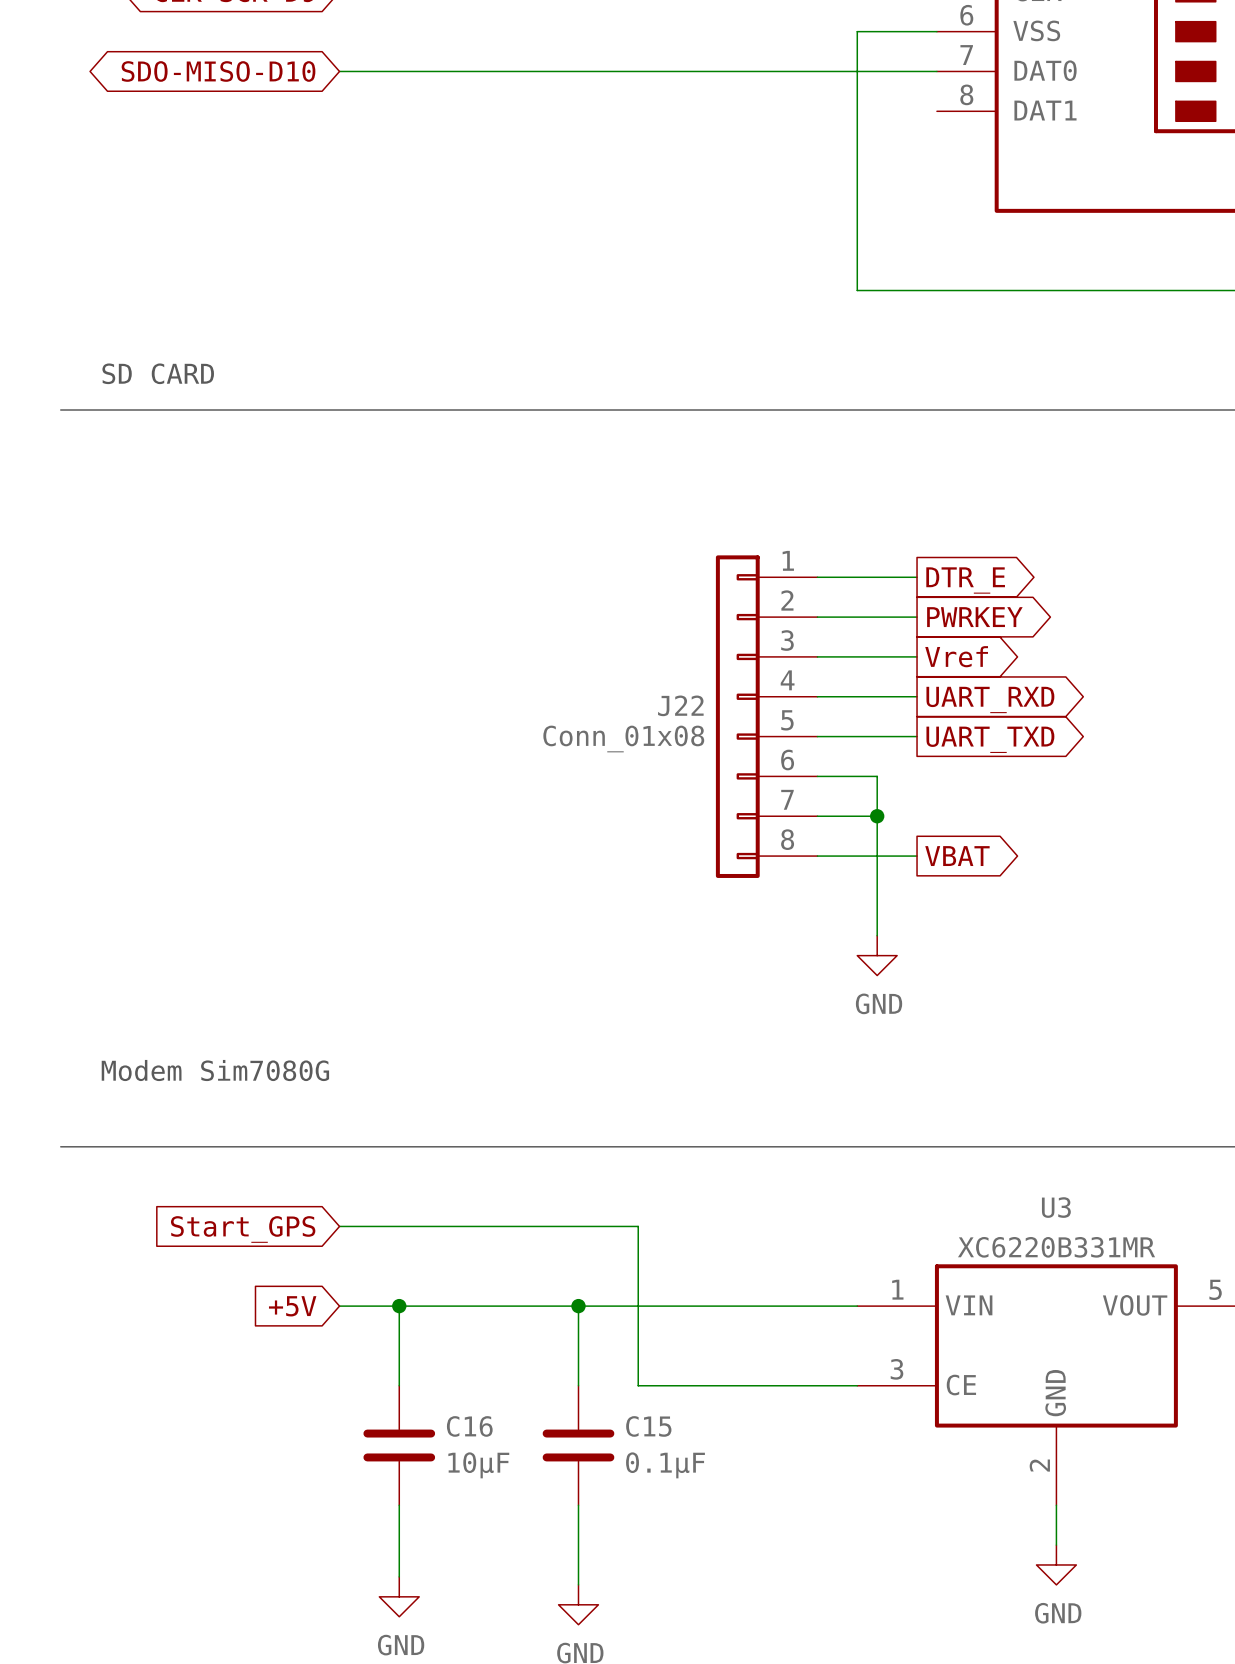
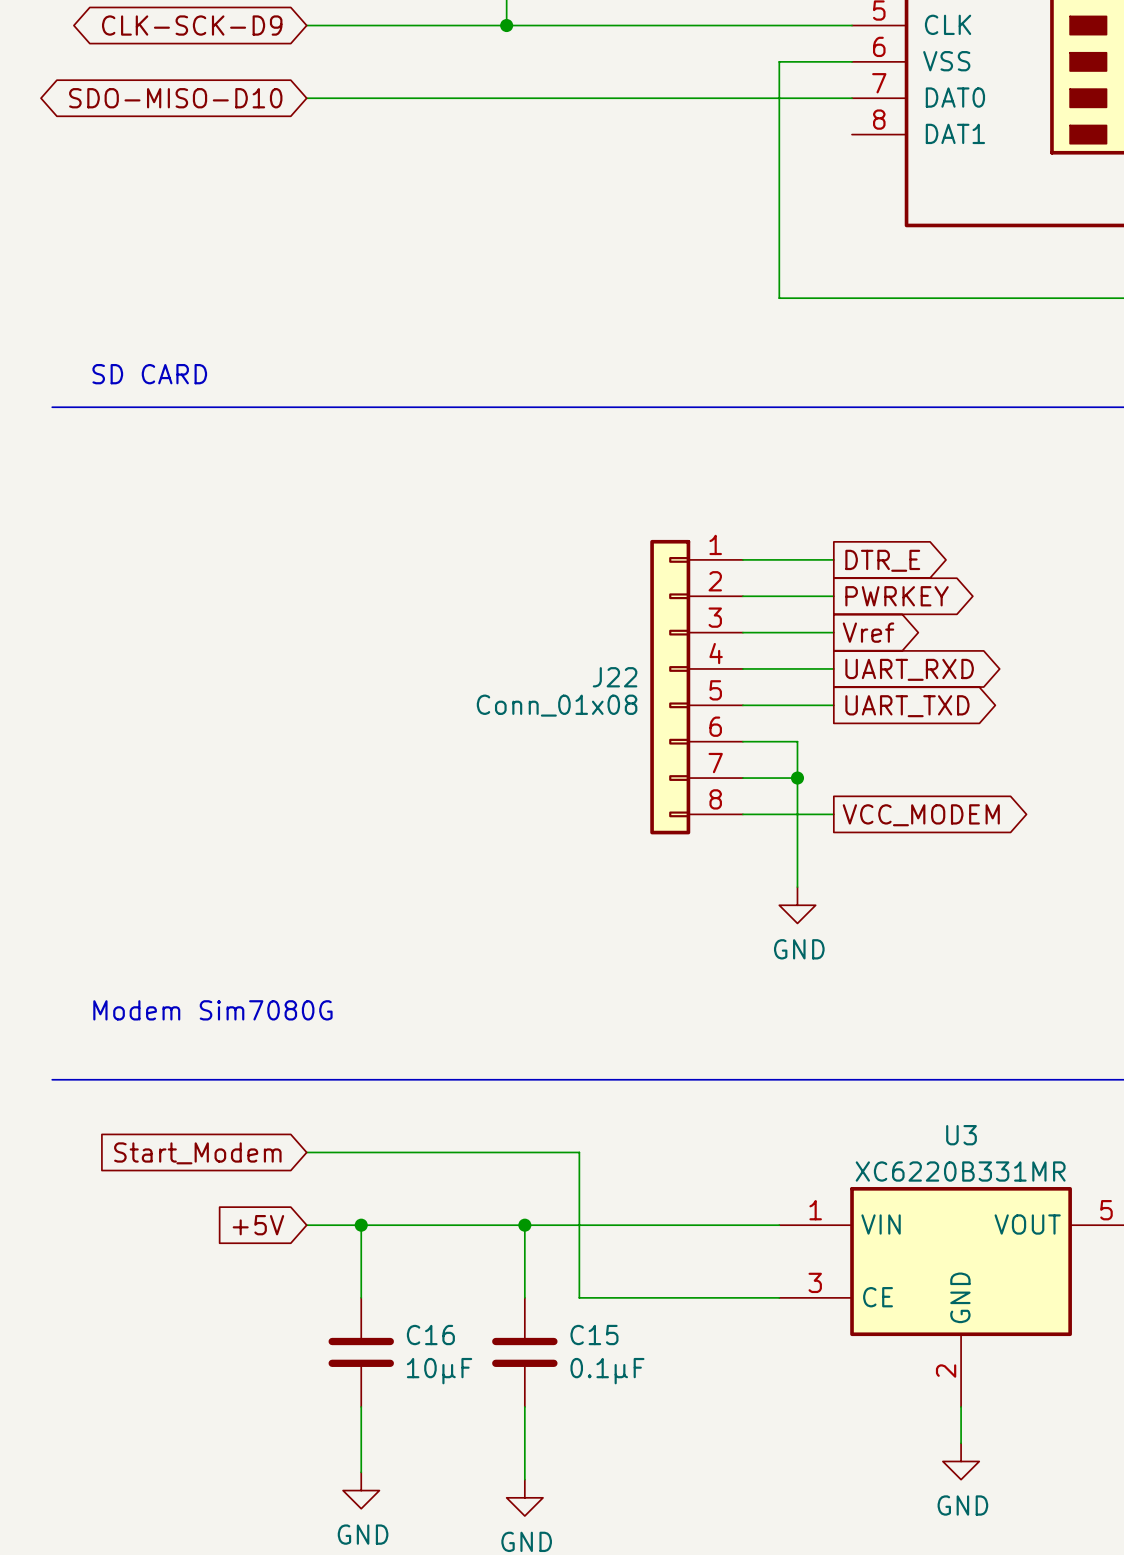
global label: VBAT (957, 856) -> VCC_MODEM (921, 815)
global label: Start_GPS (243, 1229) -> Start_Modem (197, 1153)

